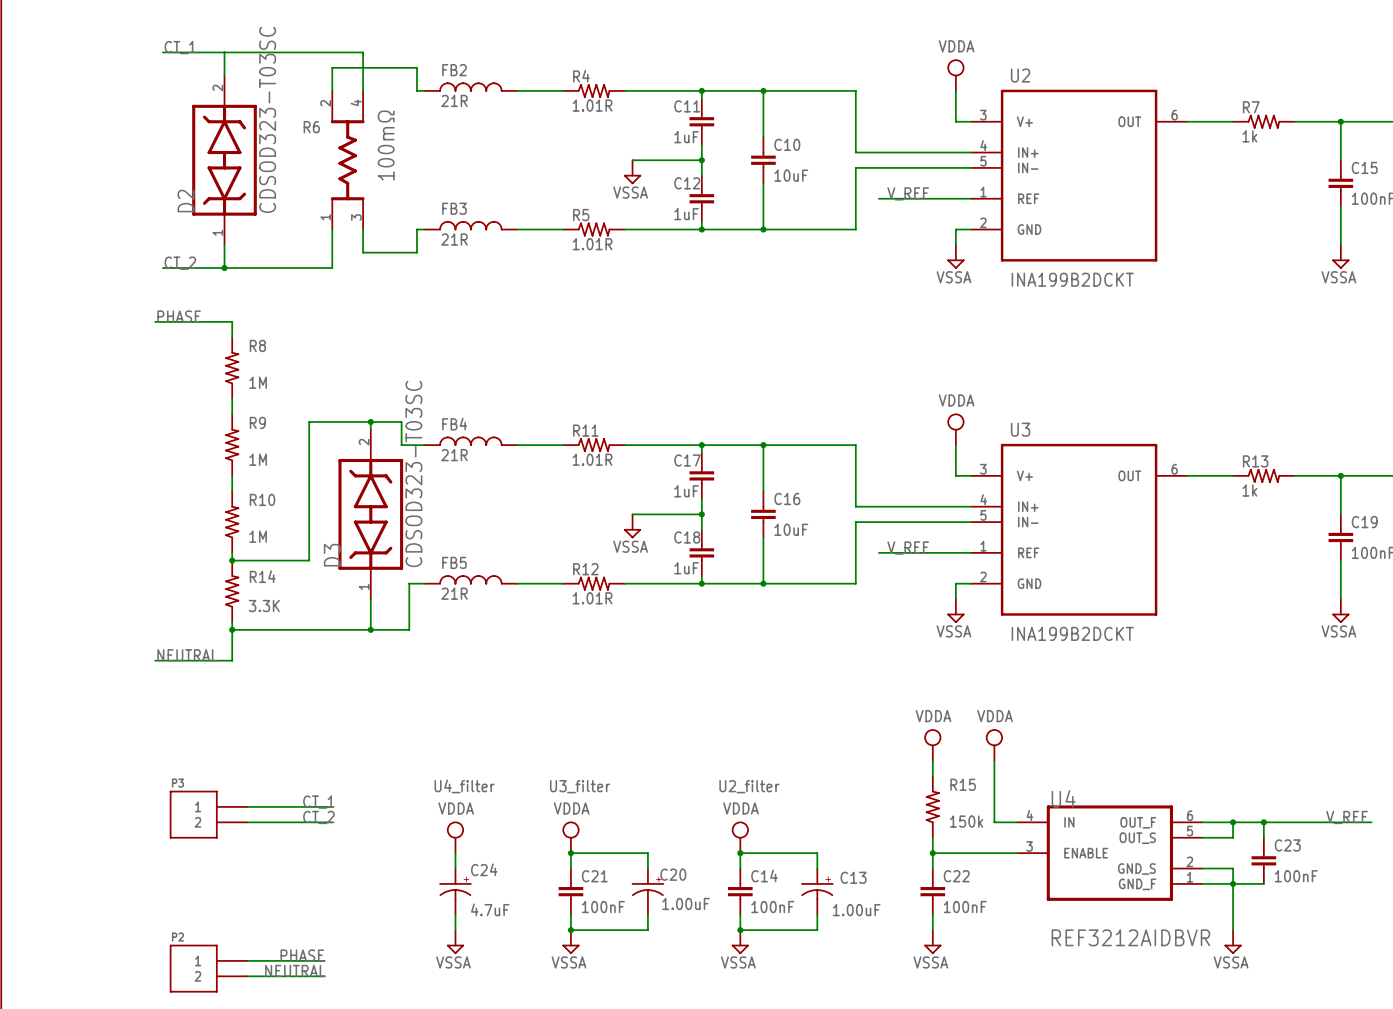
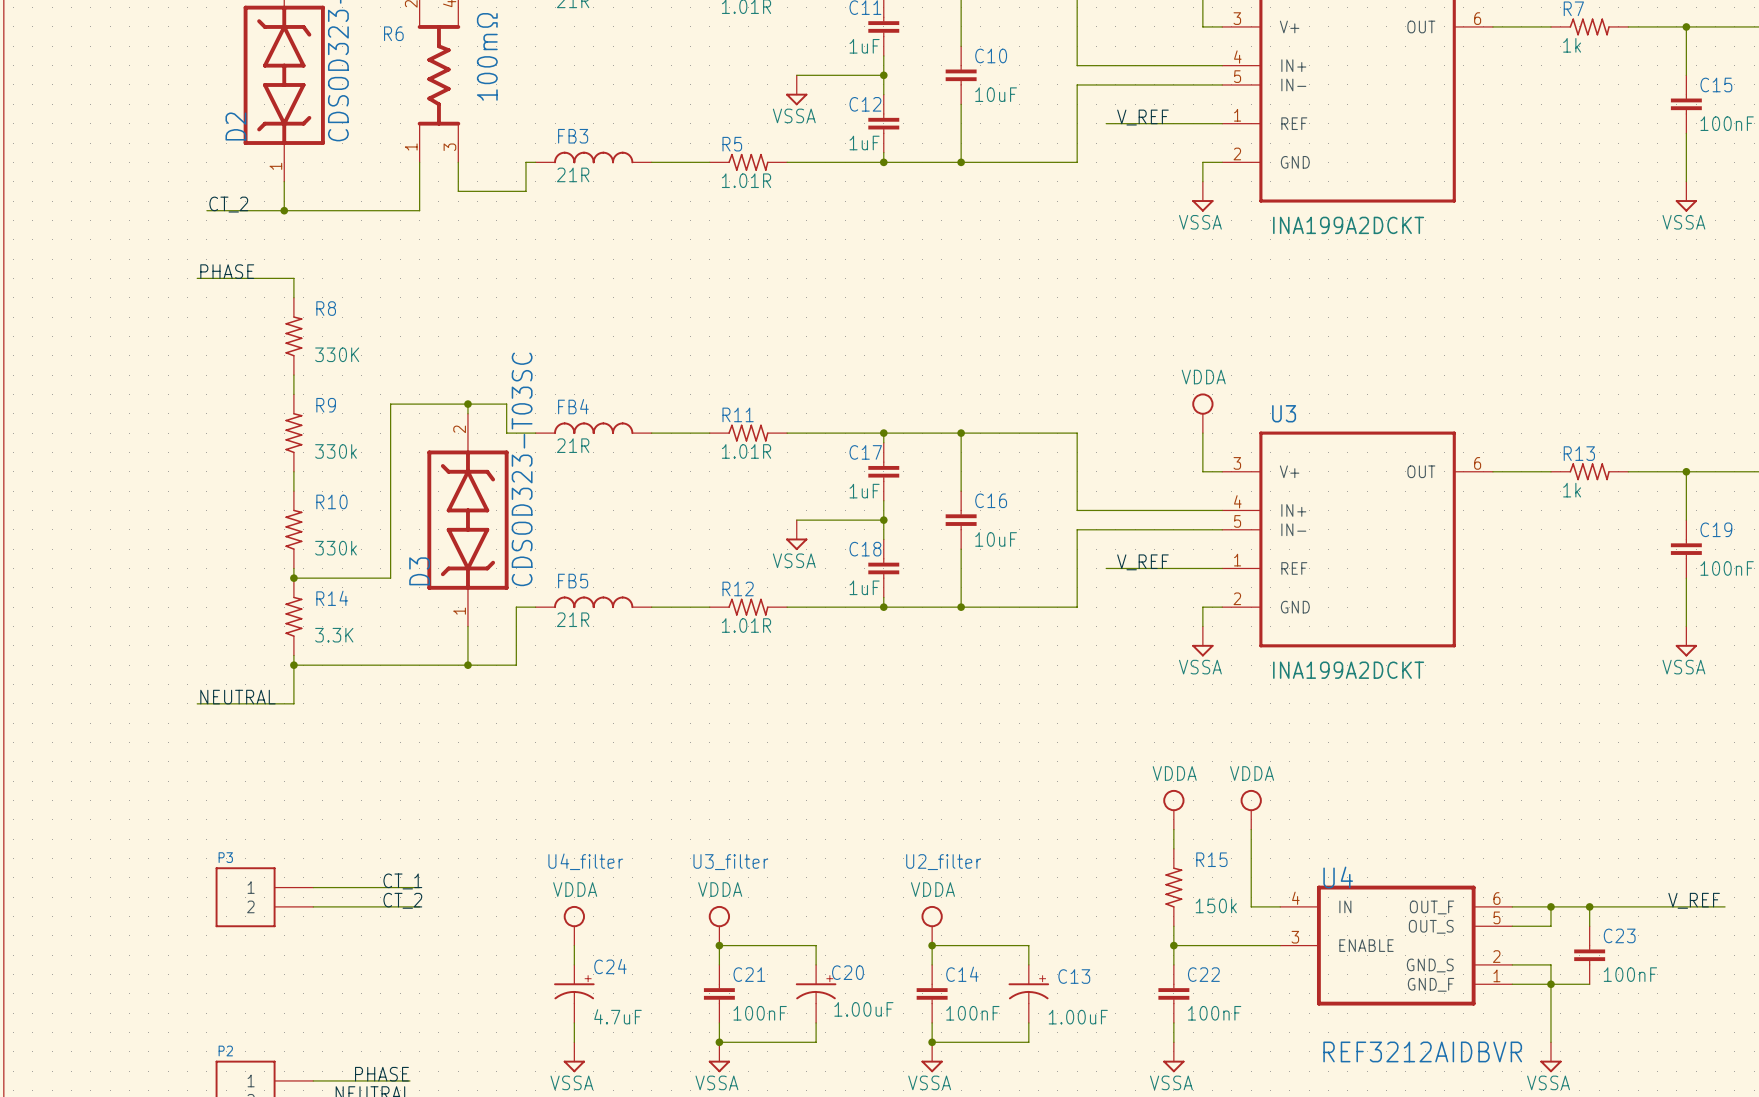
U2 value: INA199B2DCKT (1072, 279) -> INA199A2DCKT (1348, 225)
R8 value: 1M (258, 382) -> 330K (337, 354)
R9 value: 1M (258, 459) -> 330k (336, 451)
R10 value: 1M (258, 536) -> 330k (336, 548)
U3 value: INA199B2DCKT (1072, 633) -> INA199A2DCKT (1348, 670)

